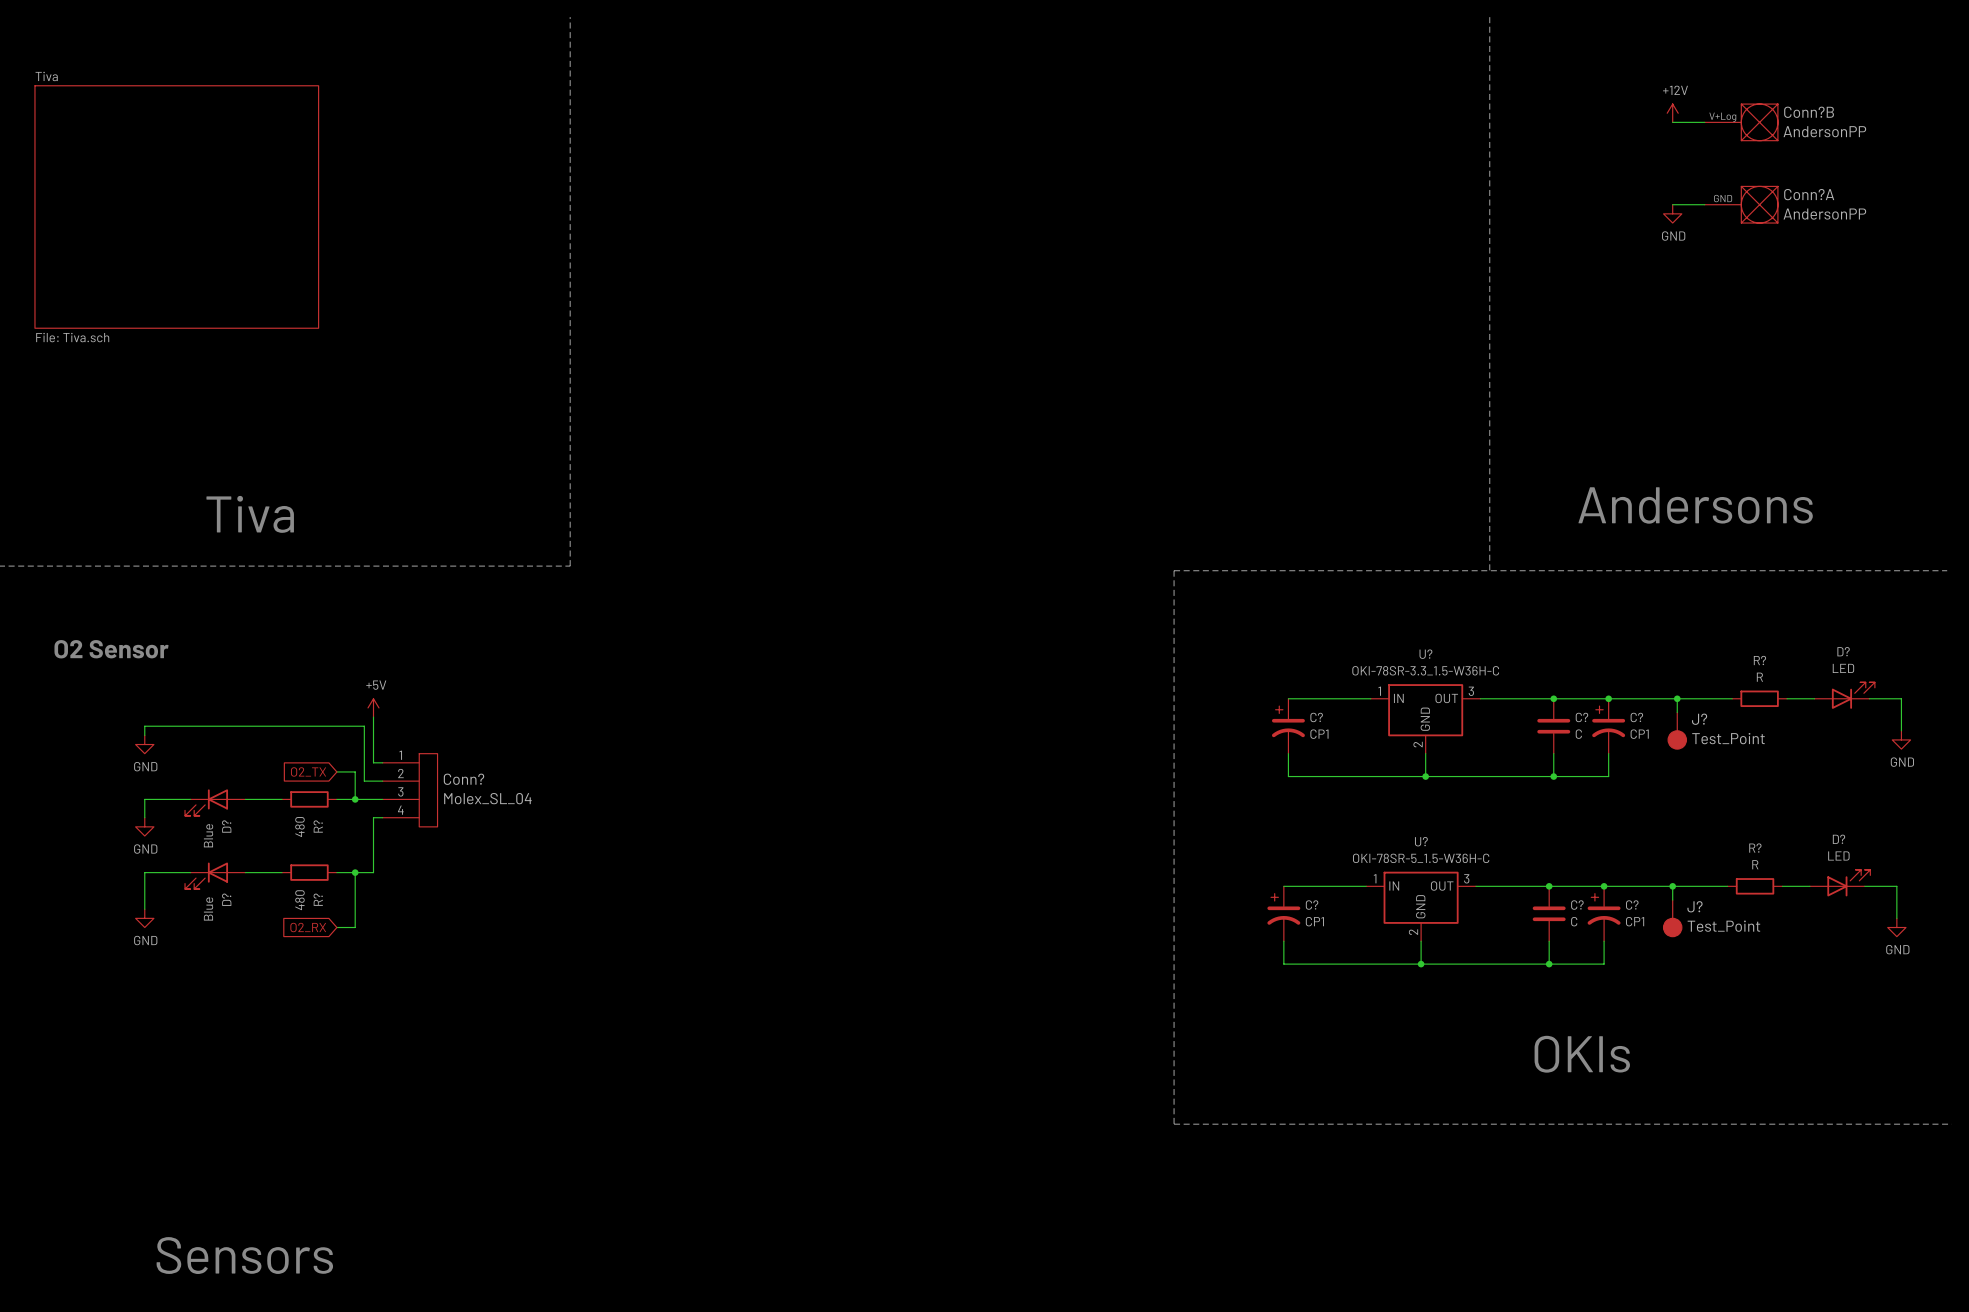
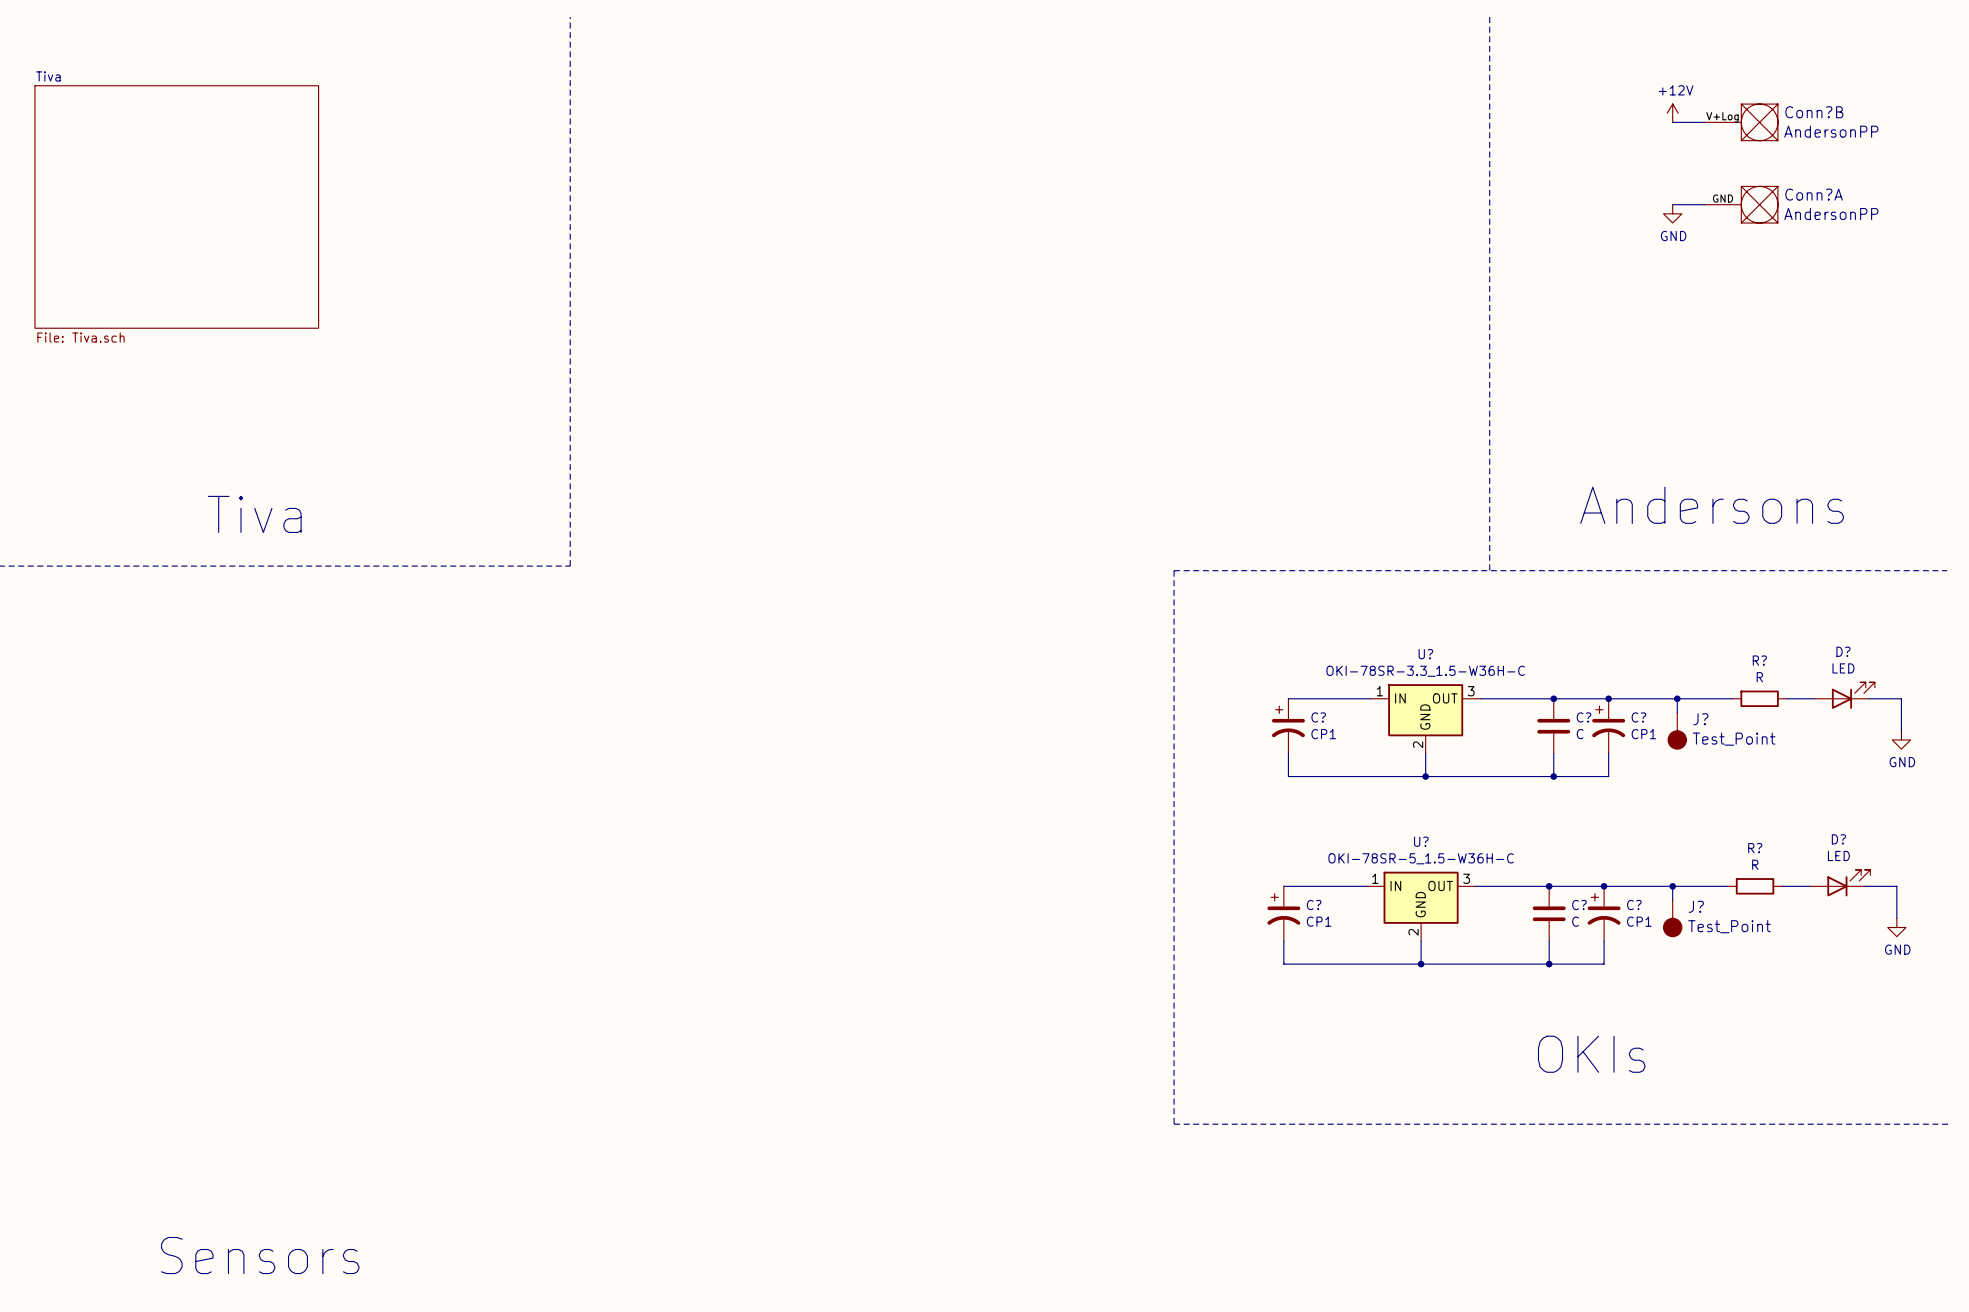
text: O2 Sensor (111, 649) -> none
power symbol: +5V (373, 707) -> none
wire: (373, 717) (373, 762) (382, 762) -> none
wire: (144, 735) (144, 726) (364, 726) (364, 781) (382, 781) -> none
power symbol: GND (144, 744) -> none
global label: O2_TX (308, 771) -> none
wire: (336, 771) (355, 771) (355, 799) -> none
Conn?: Molex_SL_04 (410, 790) -> none
wire: (190, 799) (144, 799) (144, 817) -> none
wire: (245, 799) (282, 799) -> none
R?: 480 (309, 799) -> none
wire: (336, 799) (382, 799) -> none
junction: (355, 799) -> none
D?: Blue (215, 802) -> none
wire: (382, 817) (373, 817) (373, 872) (336, 872) -> none
power symbol: GND (144, 826) -> none
wire: (190, 872) (144, 872) (144, 909) -> none
wire: (245, 872) (282, 872) -> none
R?: 480 (309, 872) -> none
wire: (355, 872) (355, 927) (336, 927) -> none
junction: (355, 872) -> none
D?: Blue (215, 875) -> none
power symbol: GND (144, 918) -> none
global label: O2_RX (308, 927) -> none

